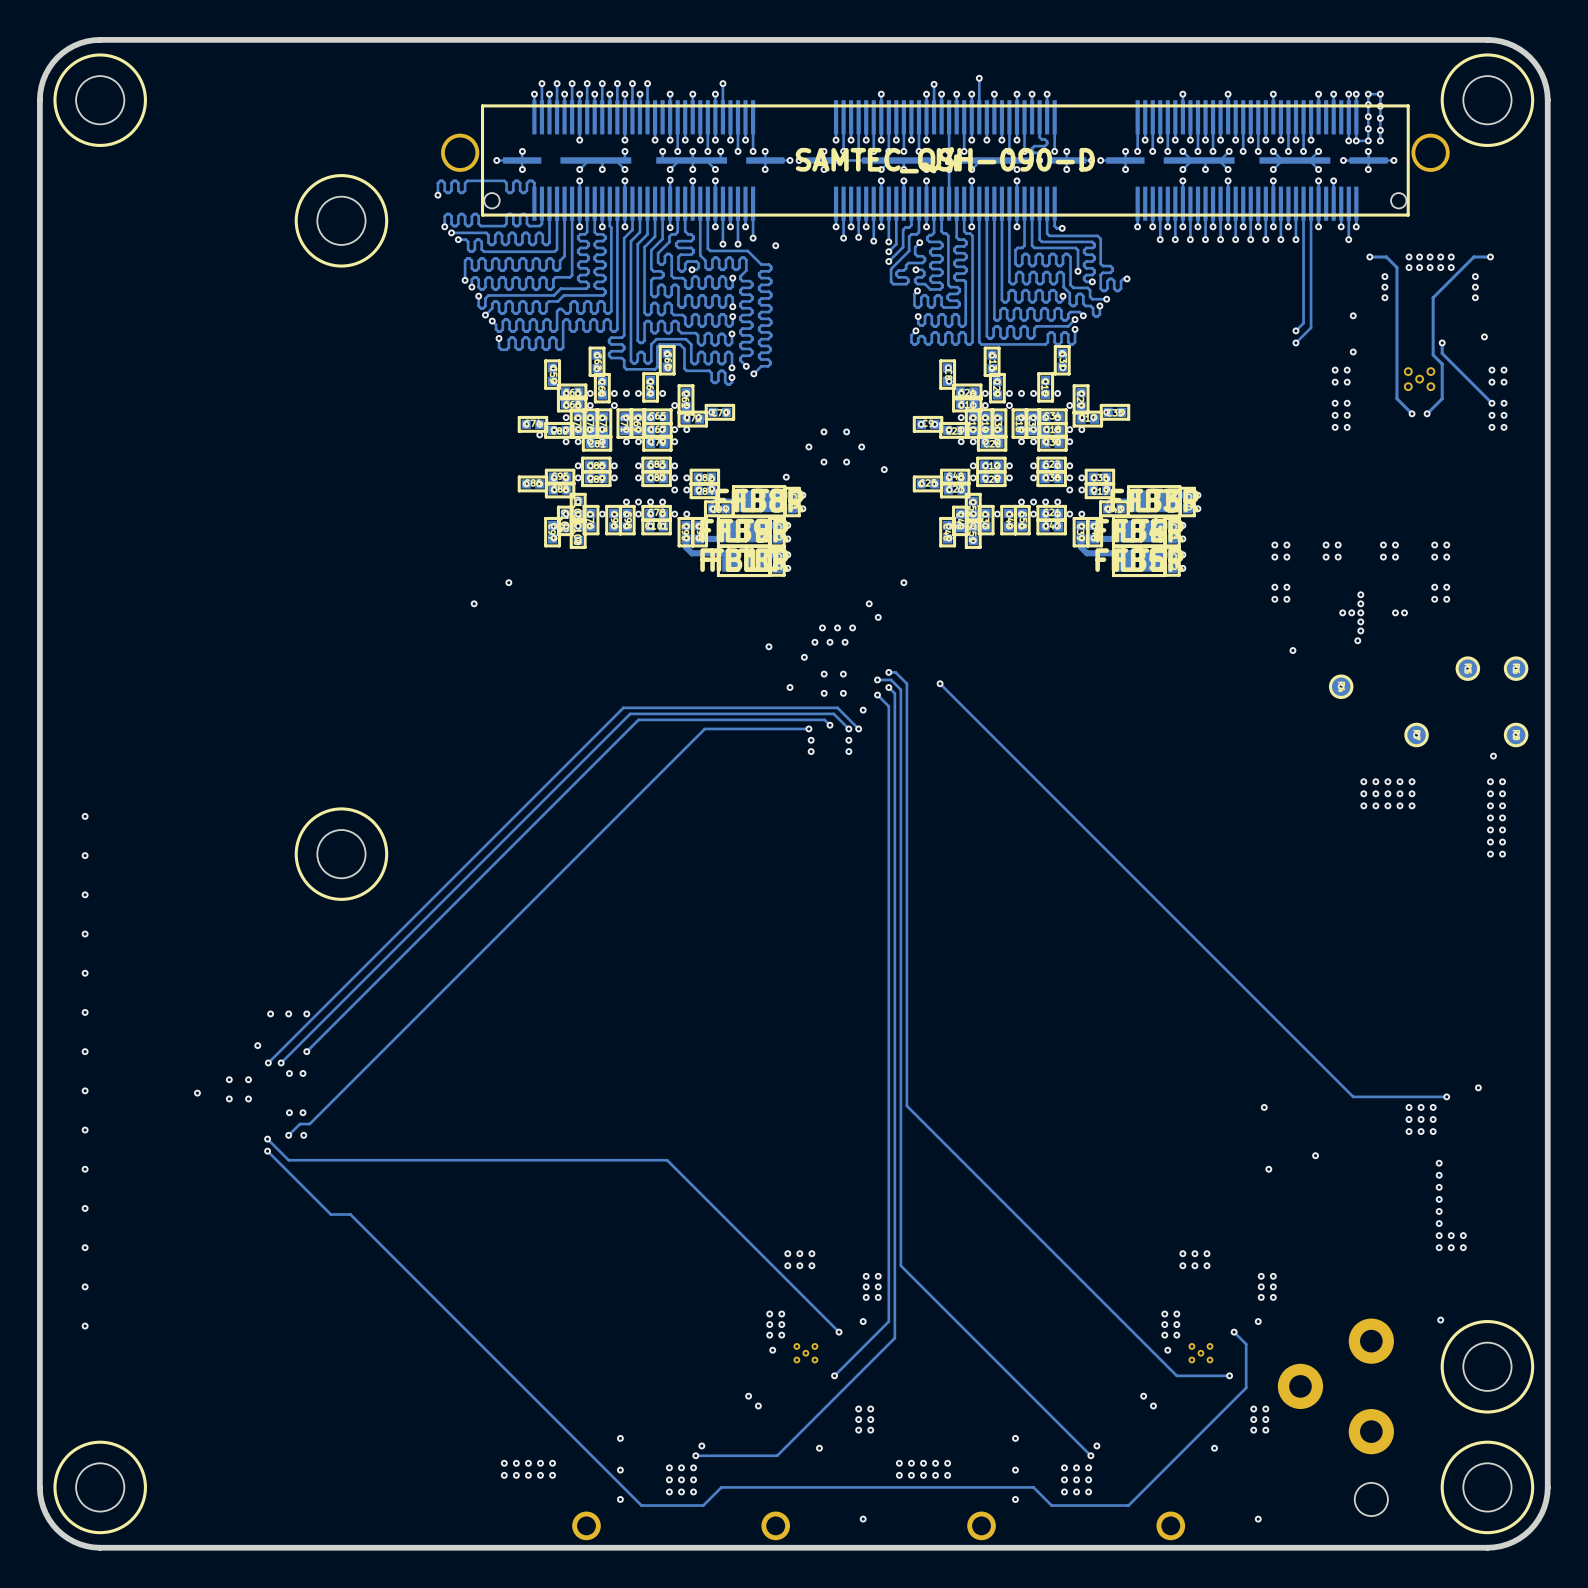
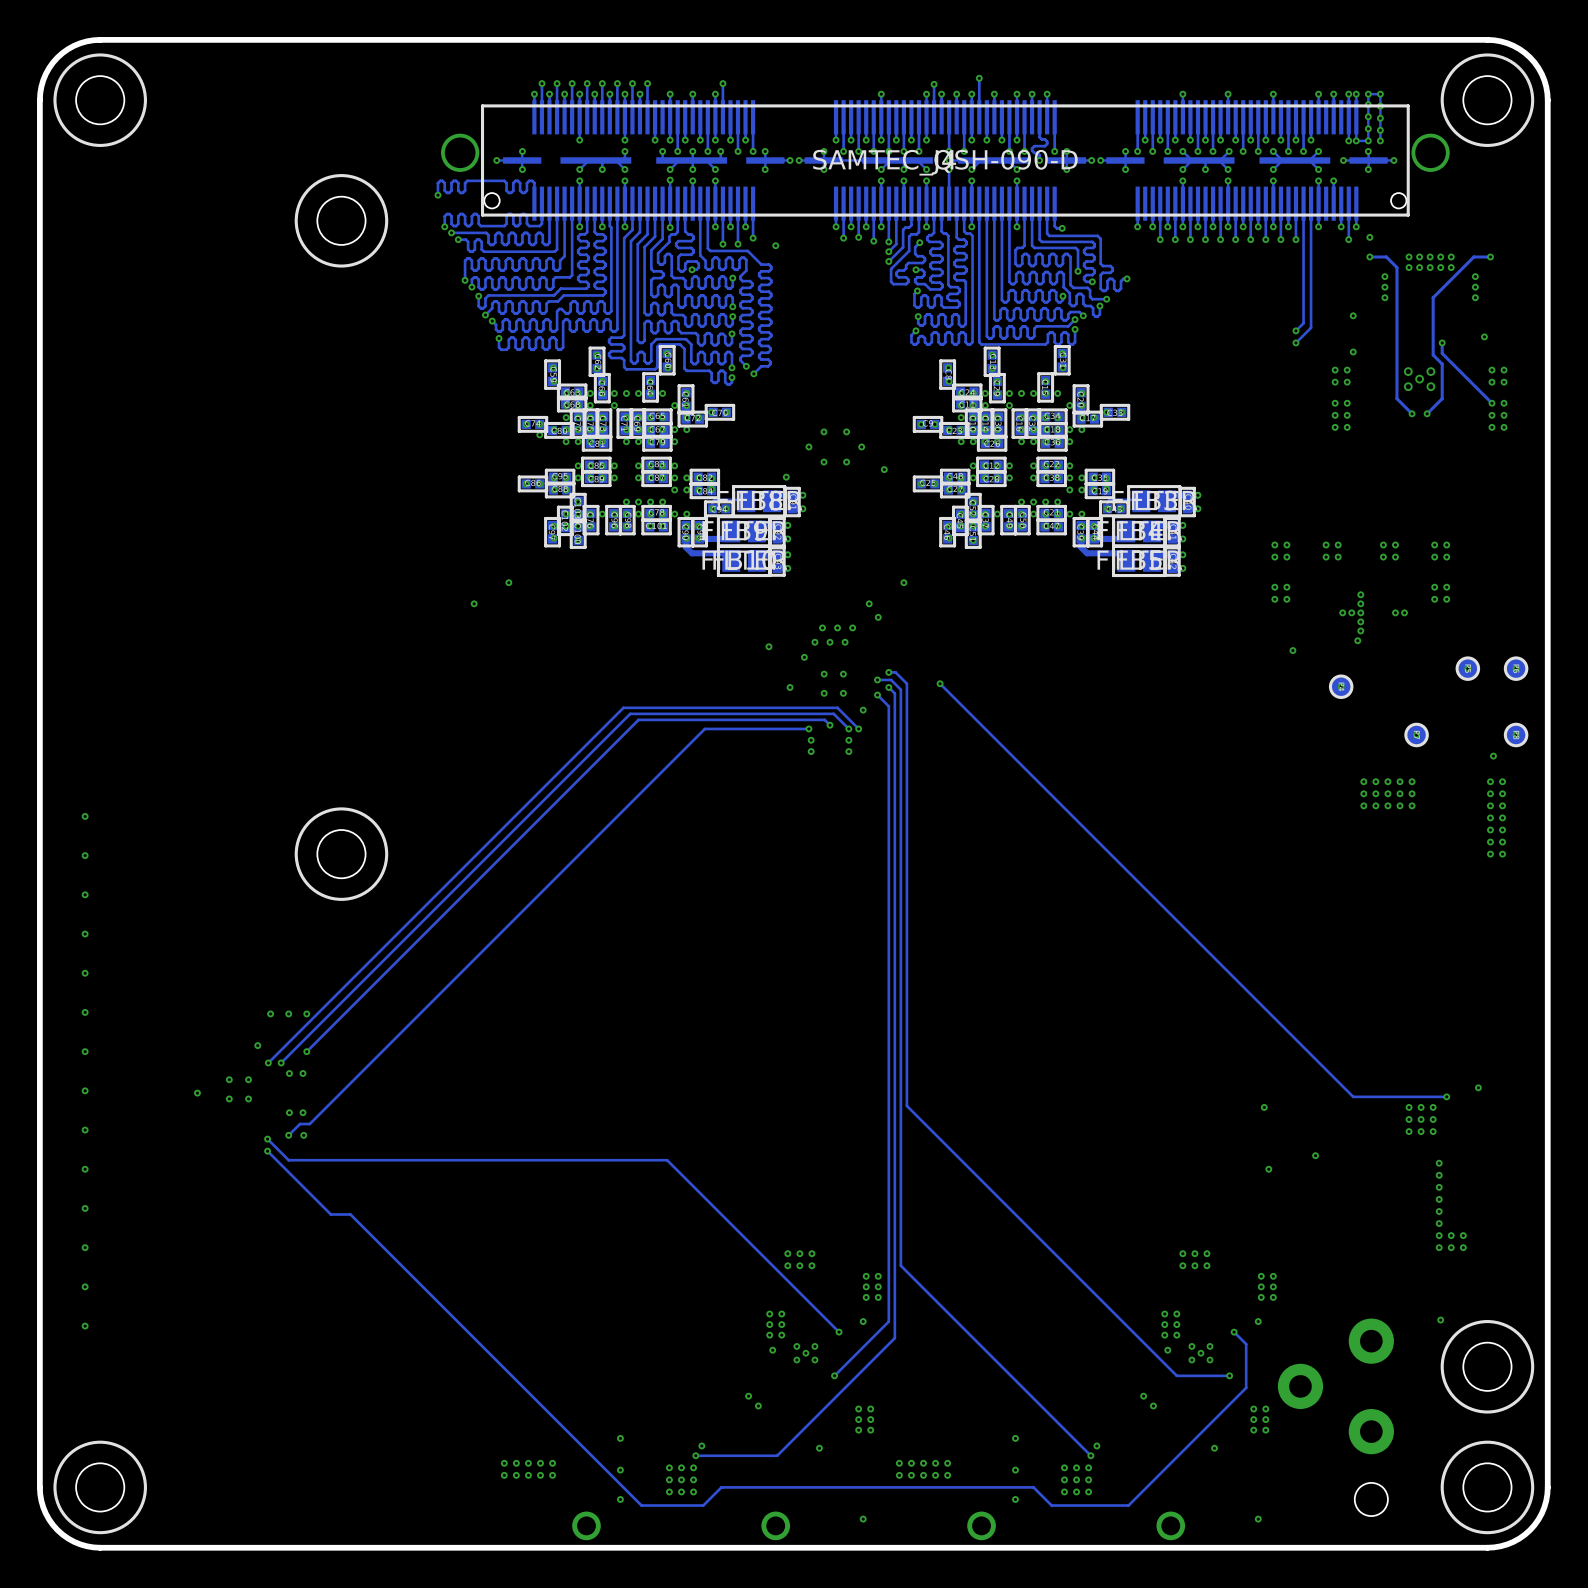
via: none -> (1369, 237)

